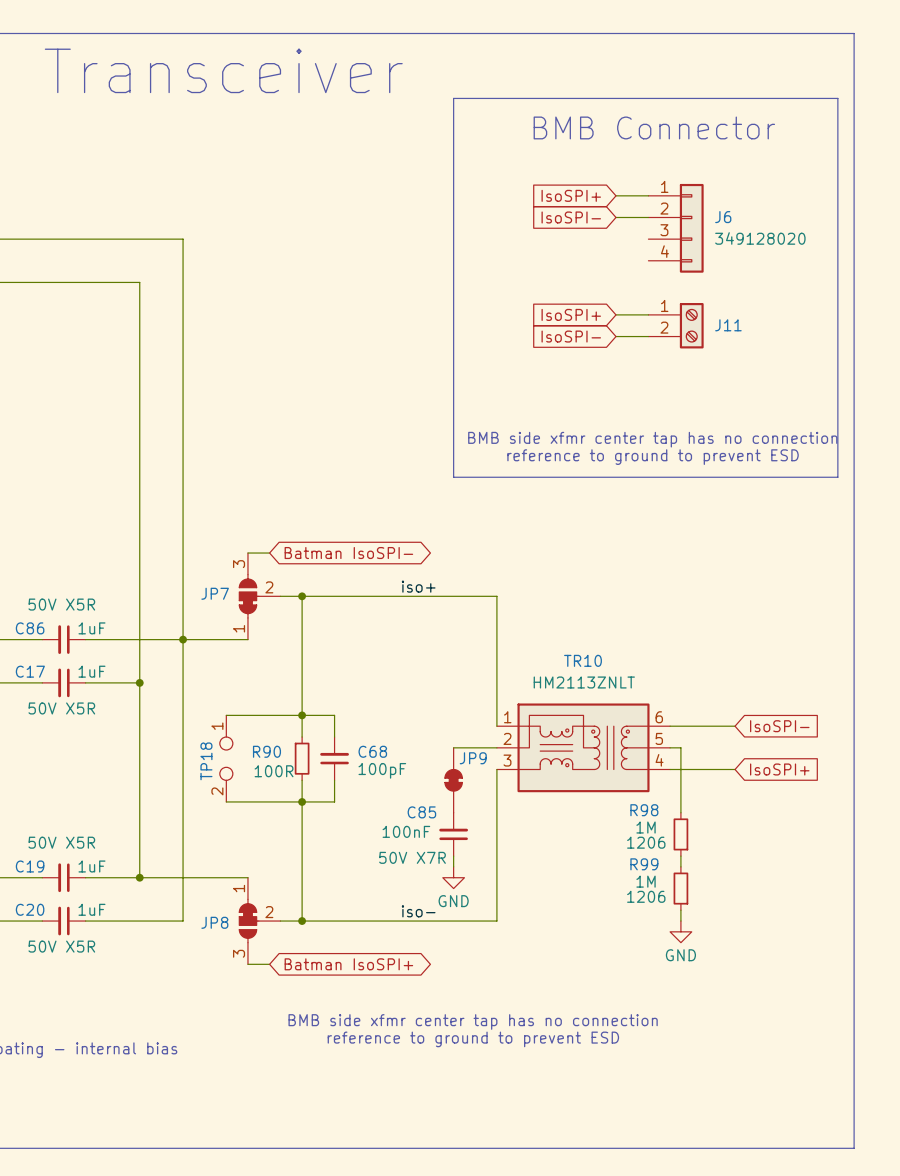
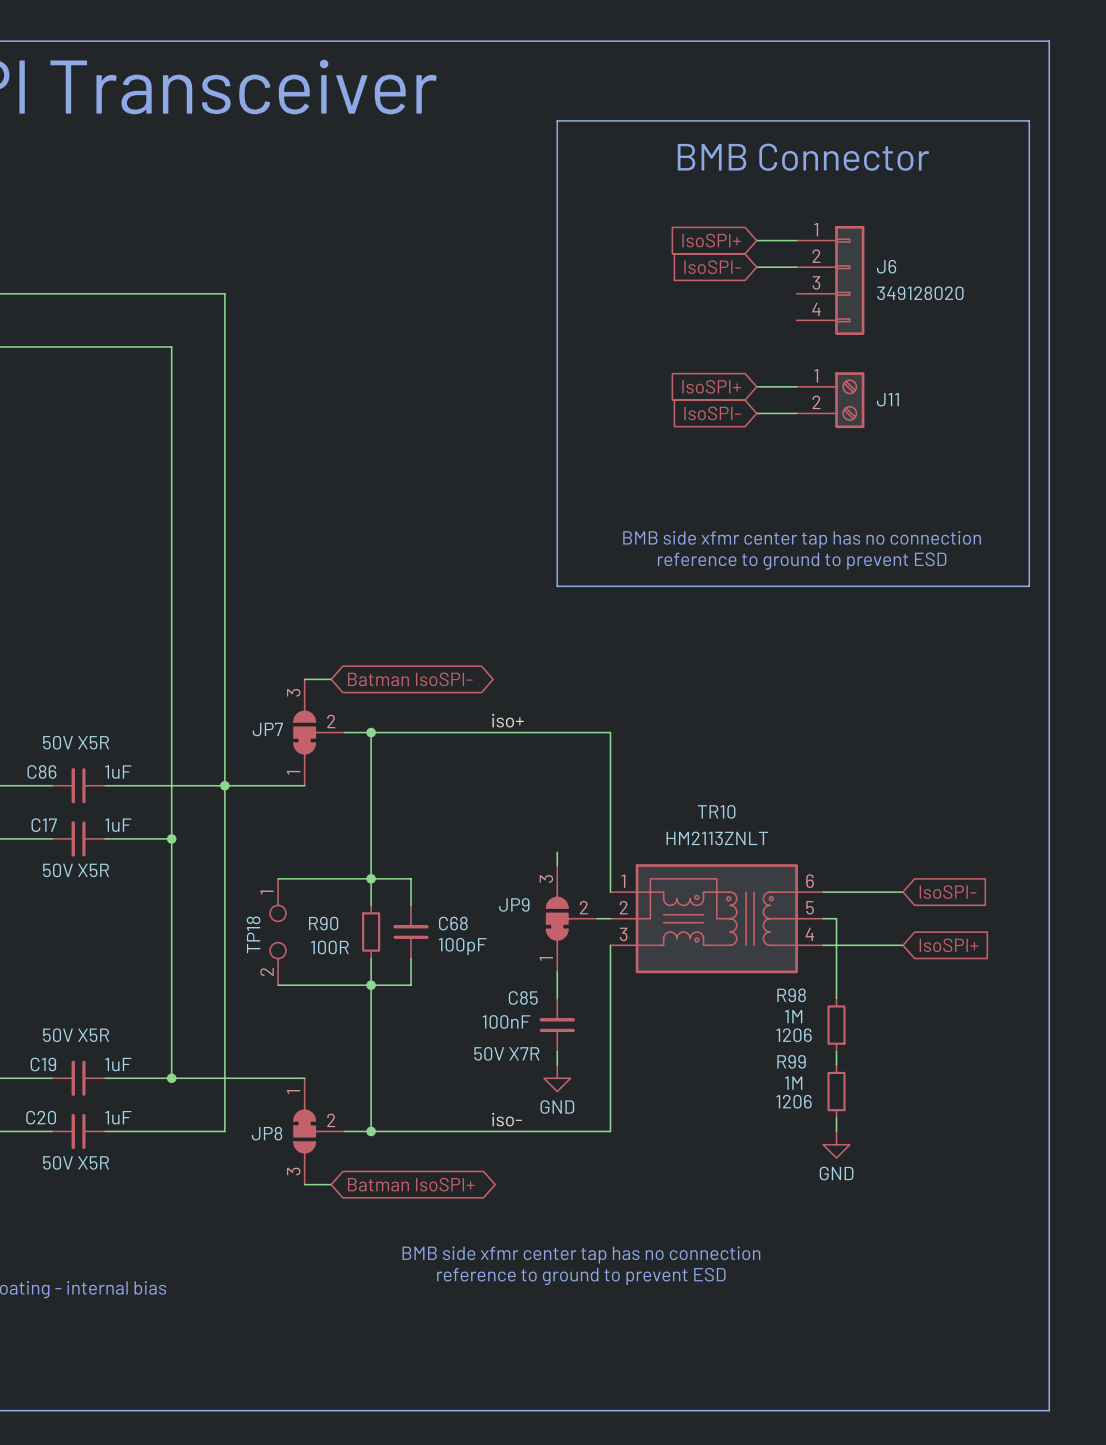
wire: none -> (557, 852) (557, 865)
JP9 symbol: [444, 747, 463, 813] -> [546, 865, 598, 972]
JP9 name position: JP9 (473, 758) -> JP9 (514, 904)

